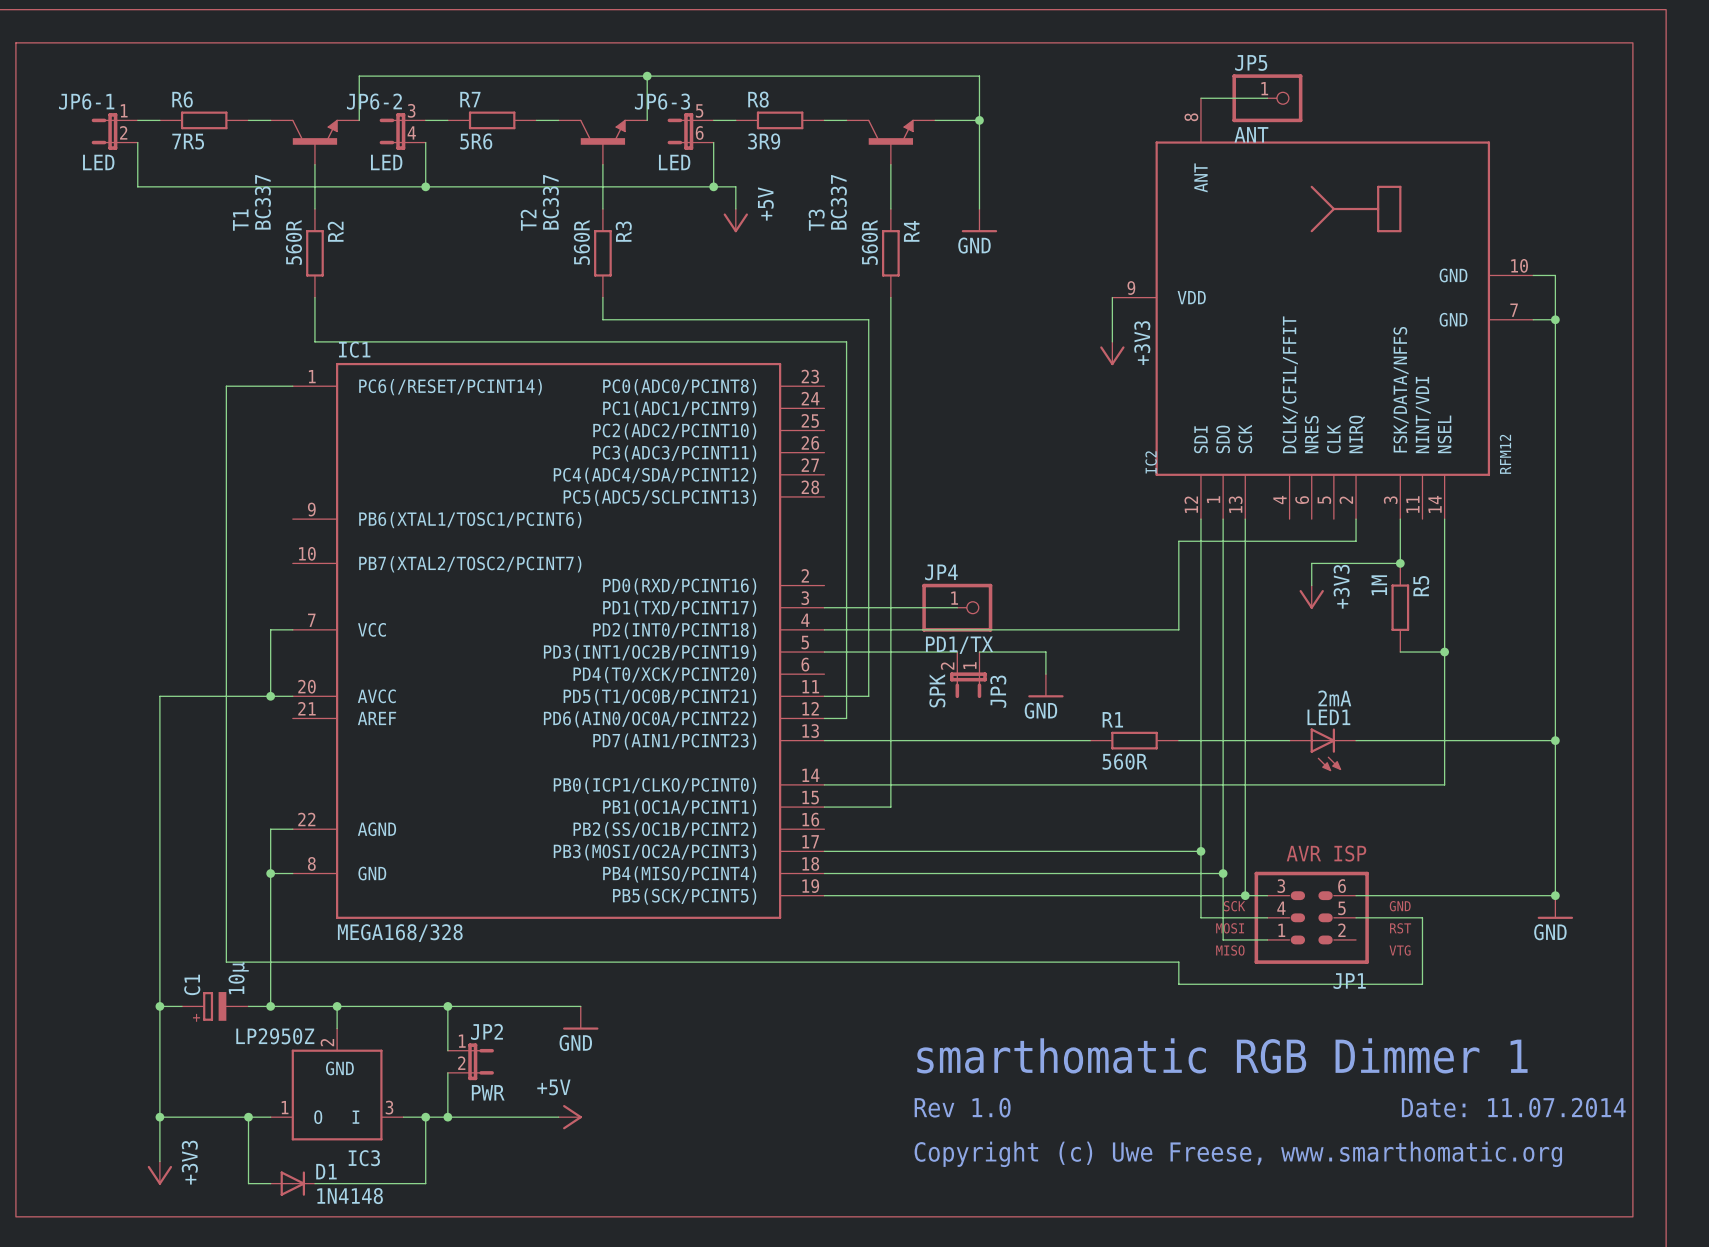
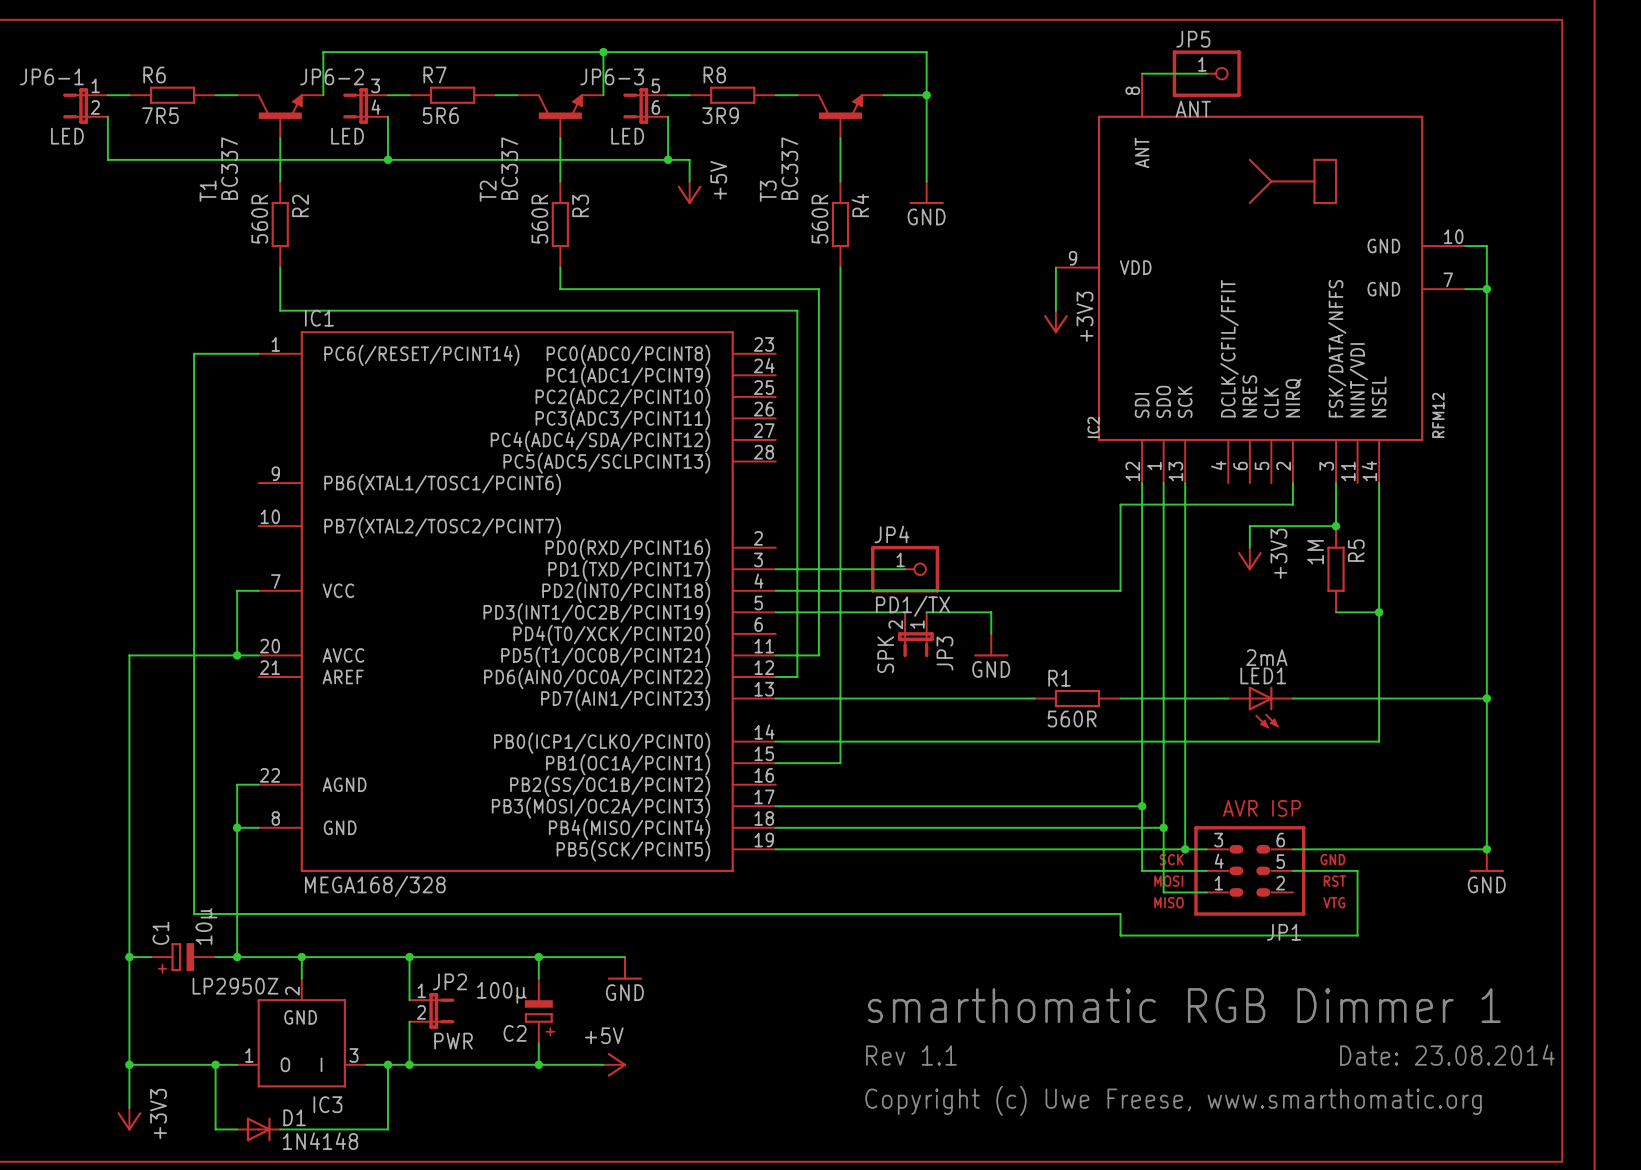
junction: none -> (538, 957)
wire: none -> (624, 957) (538, 957) (538, 978)
power symbol position: GND (580, 1018) -> GND (624, 968)
C2: none -> 100µ (538, 1010)
wire: none -> (538, 1043) (538, 1064)
text: Rev 1.0 (962, 1107) -> Rev 1.1 (911, 1055)
text: Date: 11.07.2014 (1513, 1107) -> Date: 23.08.2014 (1447, 1055)
wire: none -> (517, 1064) (603, 1064)
power symbol position: +5V (570, 1117) -> +5V (614, 1064)
junction: none -> (538, 1064)

